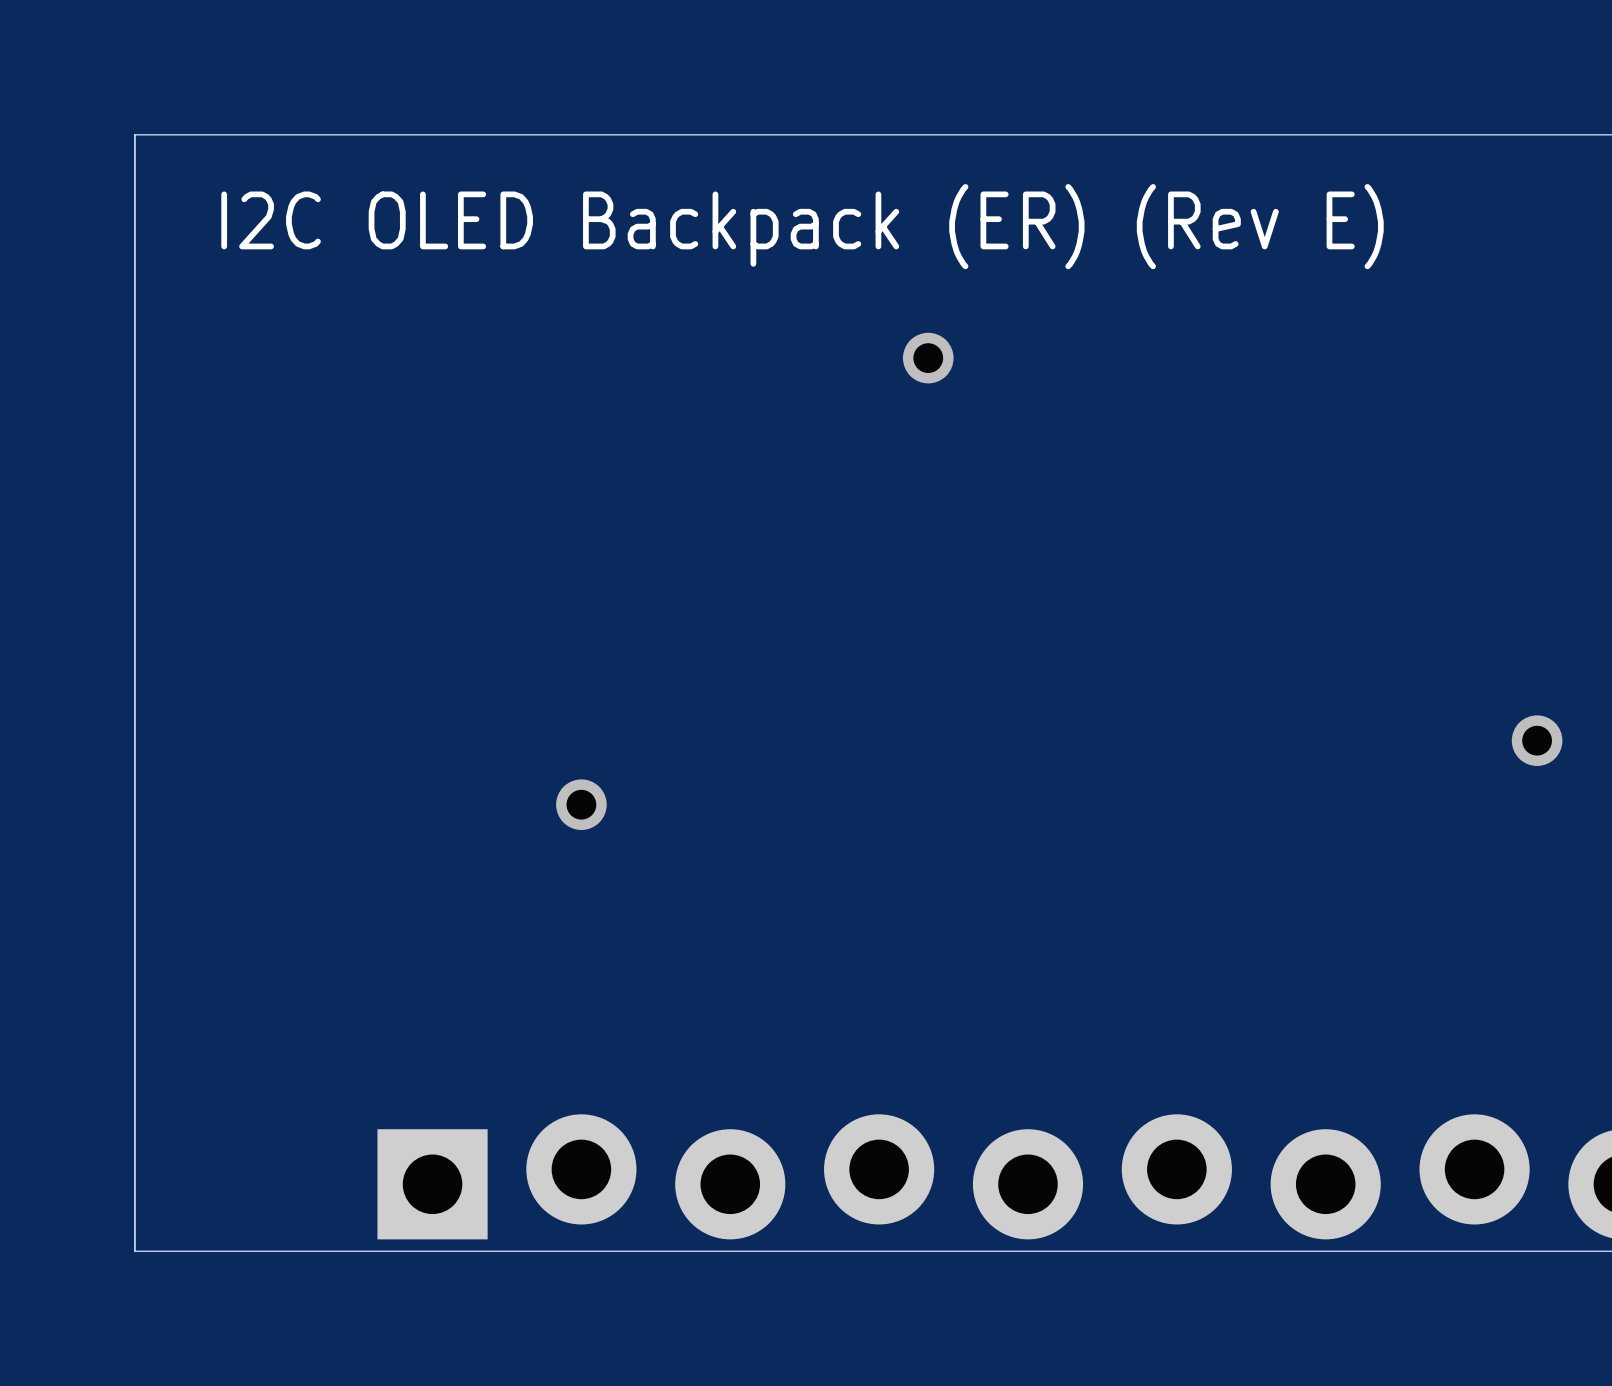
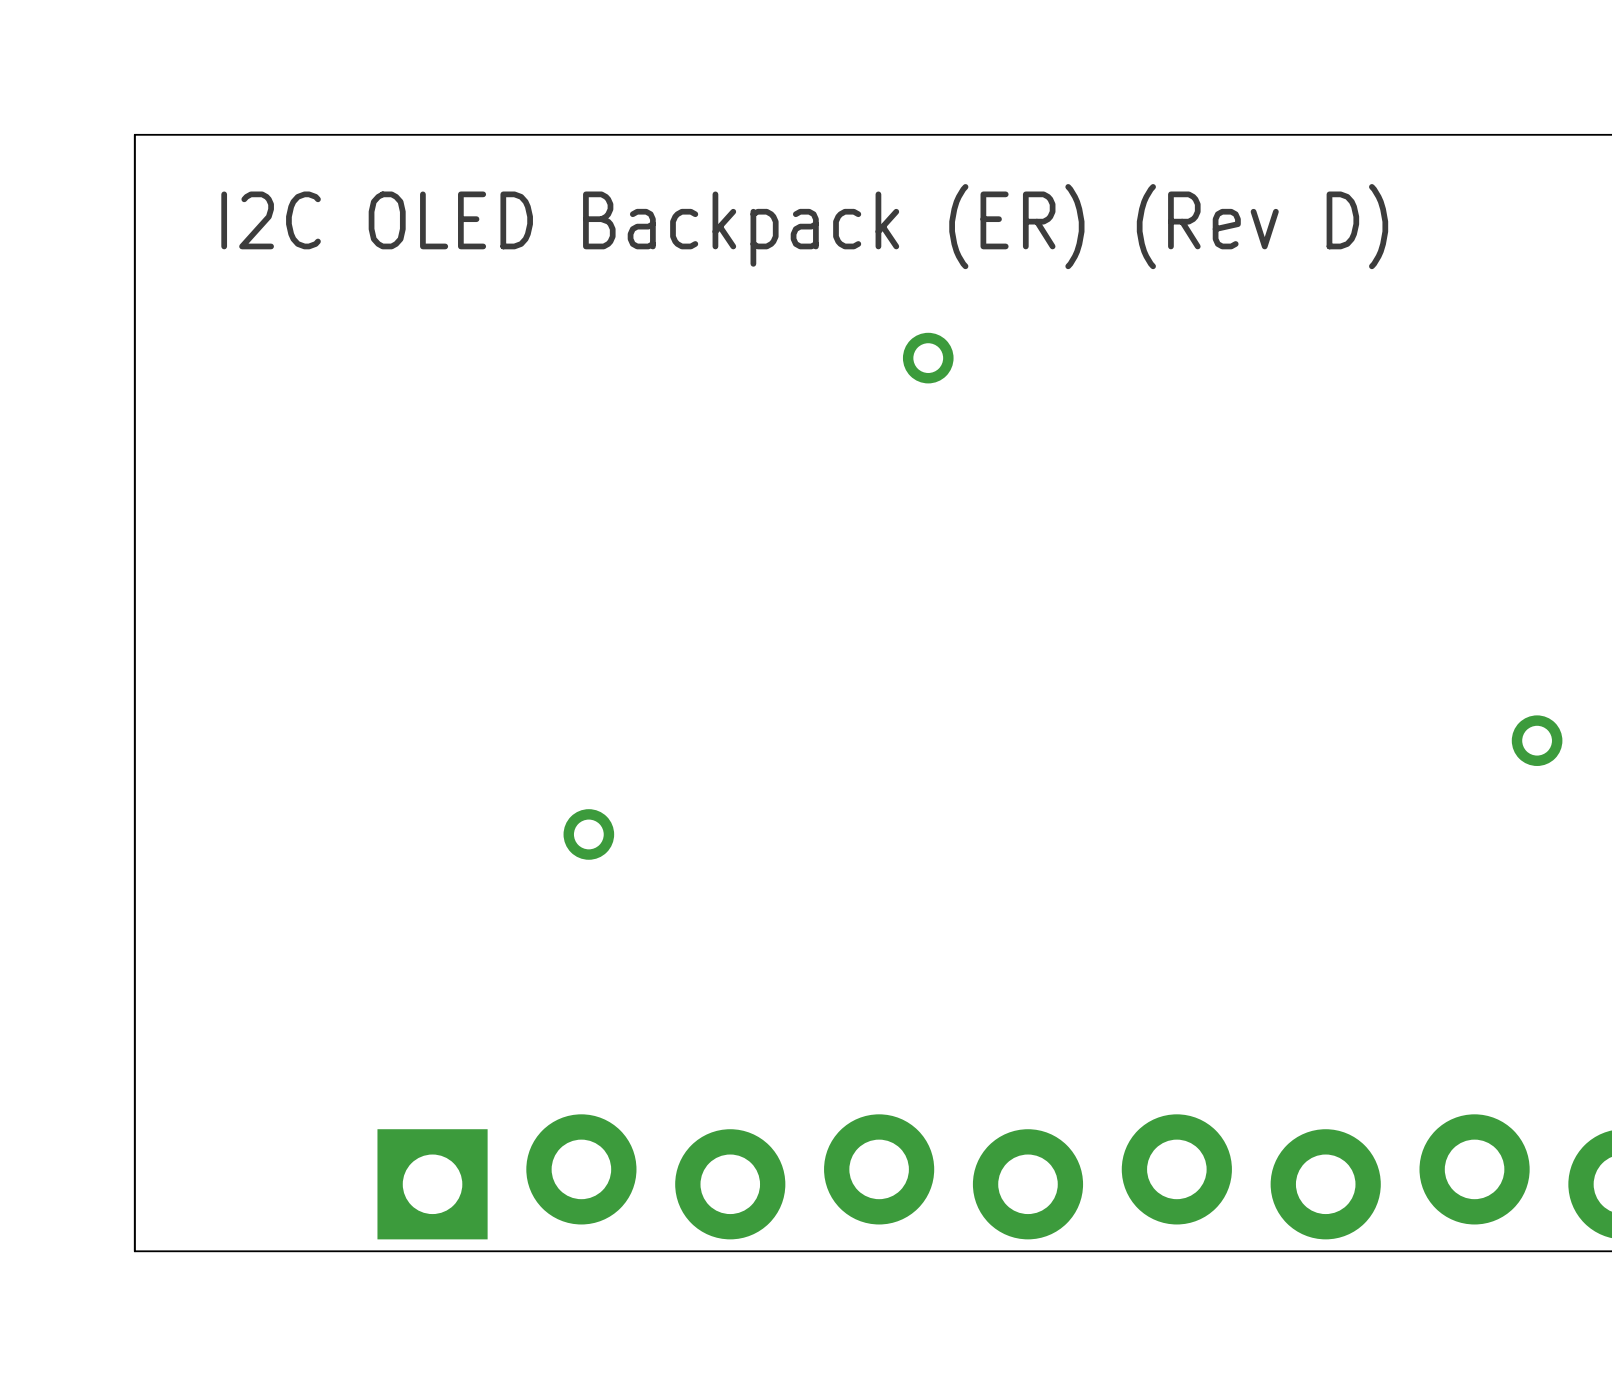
text: I2C OLED Backpack (ER) (Rev E) (802, 226) -> I2C OLED Backpack (ER) (Rev D) (804, 226)
via position: (581, 804) -> (588, 834)

